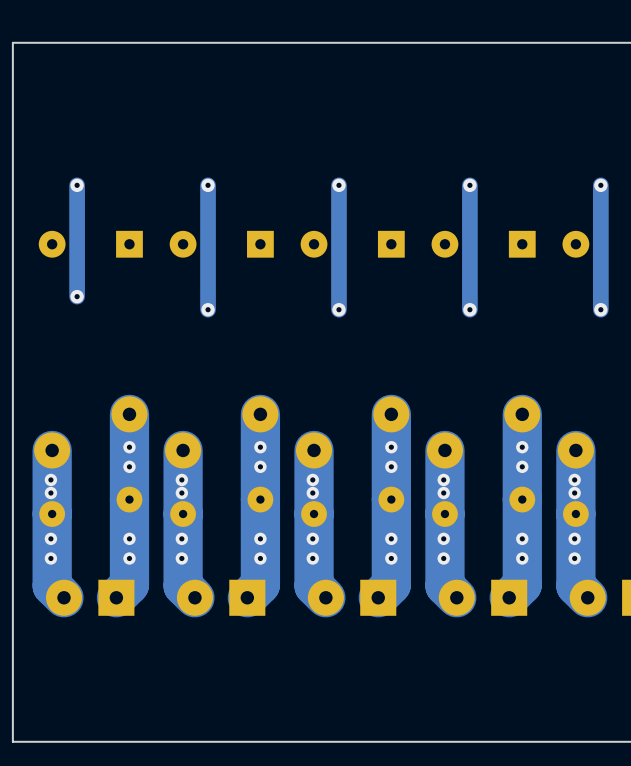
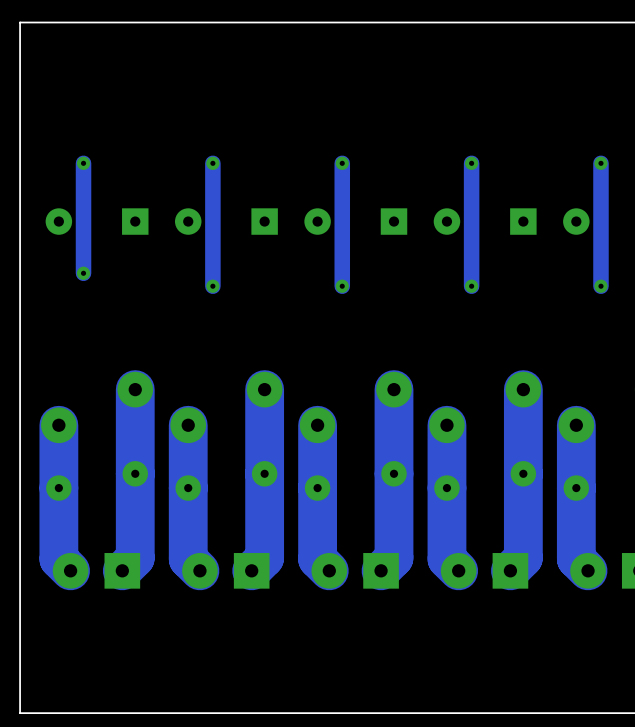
via: (129, 447) -> none
via: (260, 447) -> none
via: (391, 447) -> none
via: (522, 447) -> none
via: (129, 466) -> none
via: (260, 466) -> none
via: (391, 466) -> none
via: (522, 466) -> none
via: (50, 479) -> none
via: (181, 479) -> none
via: (312, 479) -> none
via: (443, 479) -> none
via: (574, 479) -> none
via: (50, 493) -> none
via: (181, 493) -> none
via: (312, 493) -> none
via: (443, 493) -> none
via: (574, 493) -> none
via: (50, 538) -> none
via: (129, 538) -> none
via: (181, 538) -> none
via: (260, 538) -> none
via: (312, 538) -> none
via: (391, 538) -> none
via: (443, 538) -> none
via: (522, 538) -> none
via: (574, 538) -> none
via: (50, 558) -> none
via: (129, 558) -> none
via: (181, 558) -> none
via: (260, 558) -> none
via: (312, 558) -> none
via: (391, 558) -> none
via: (443, 558) -> none
via: (522, 558) -> none
via: (574, 558) -> none

